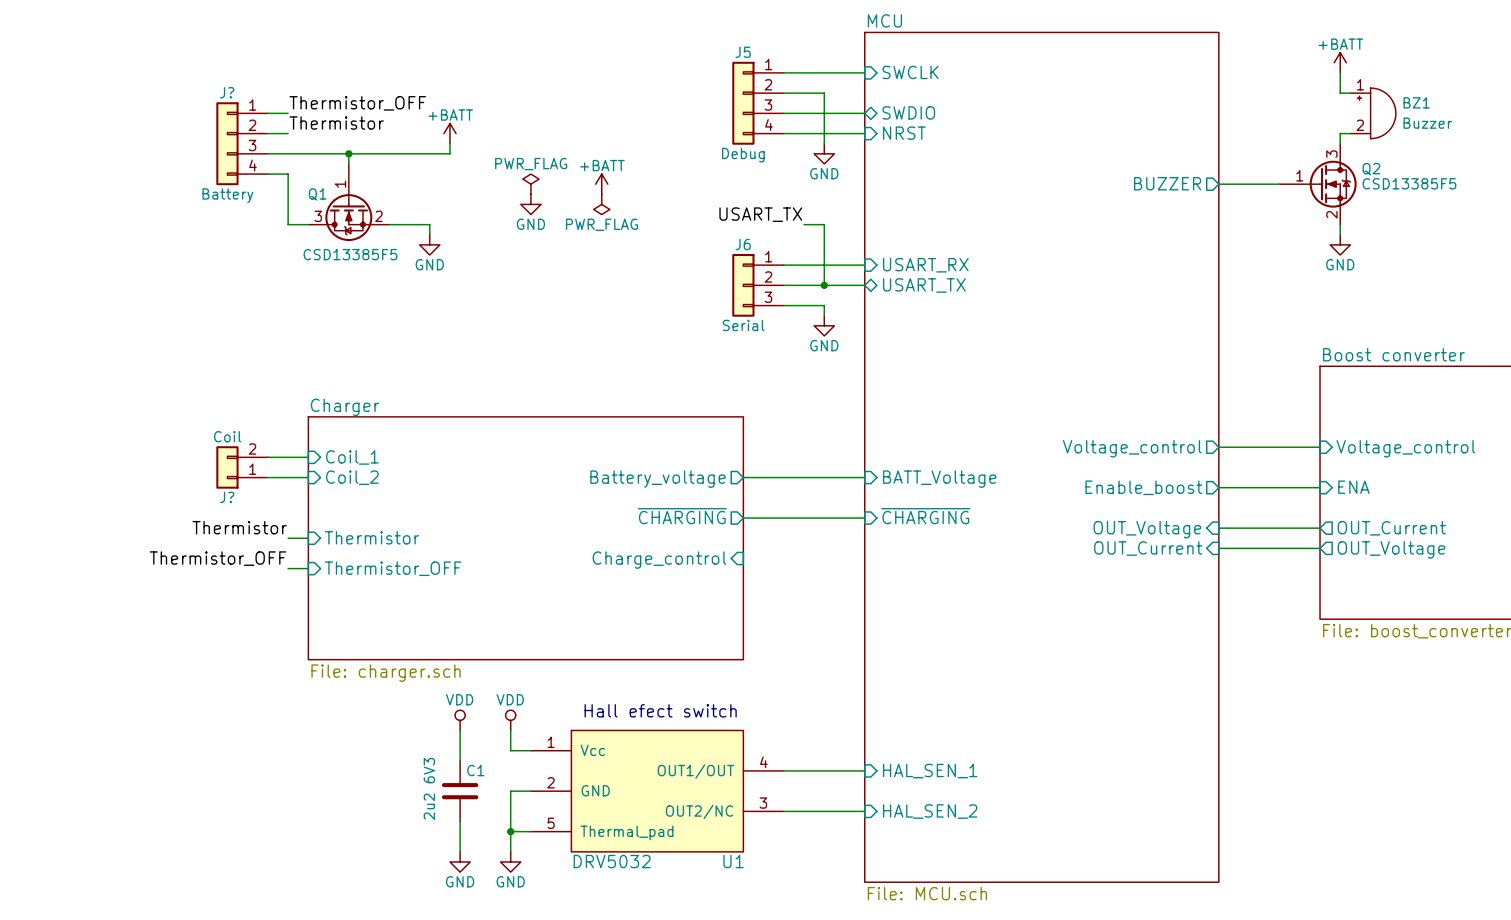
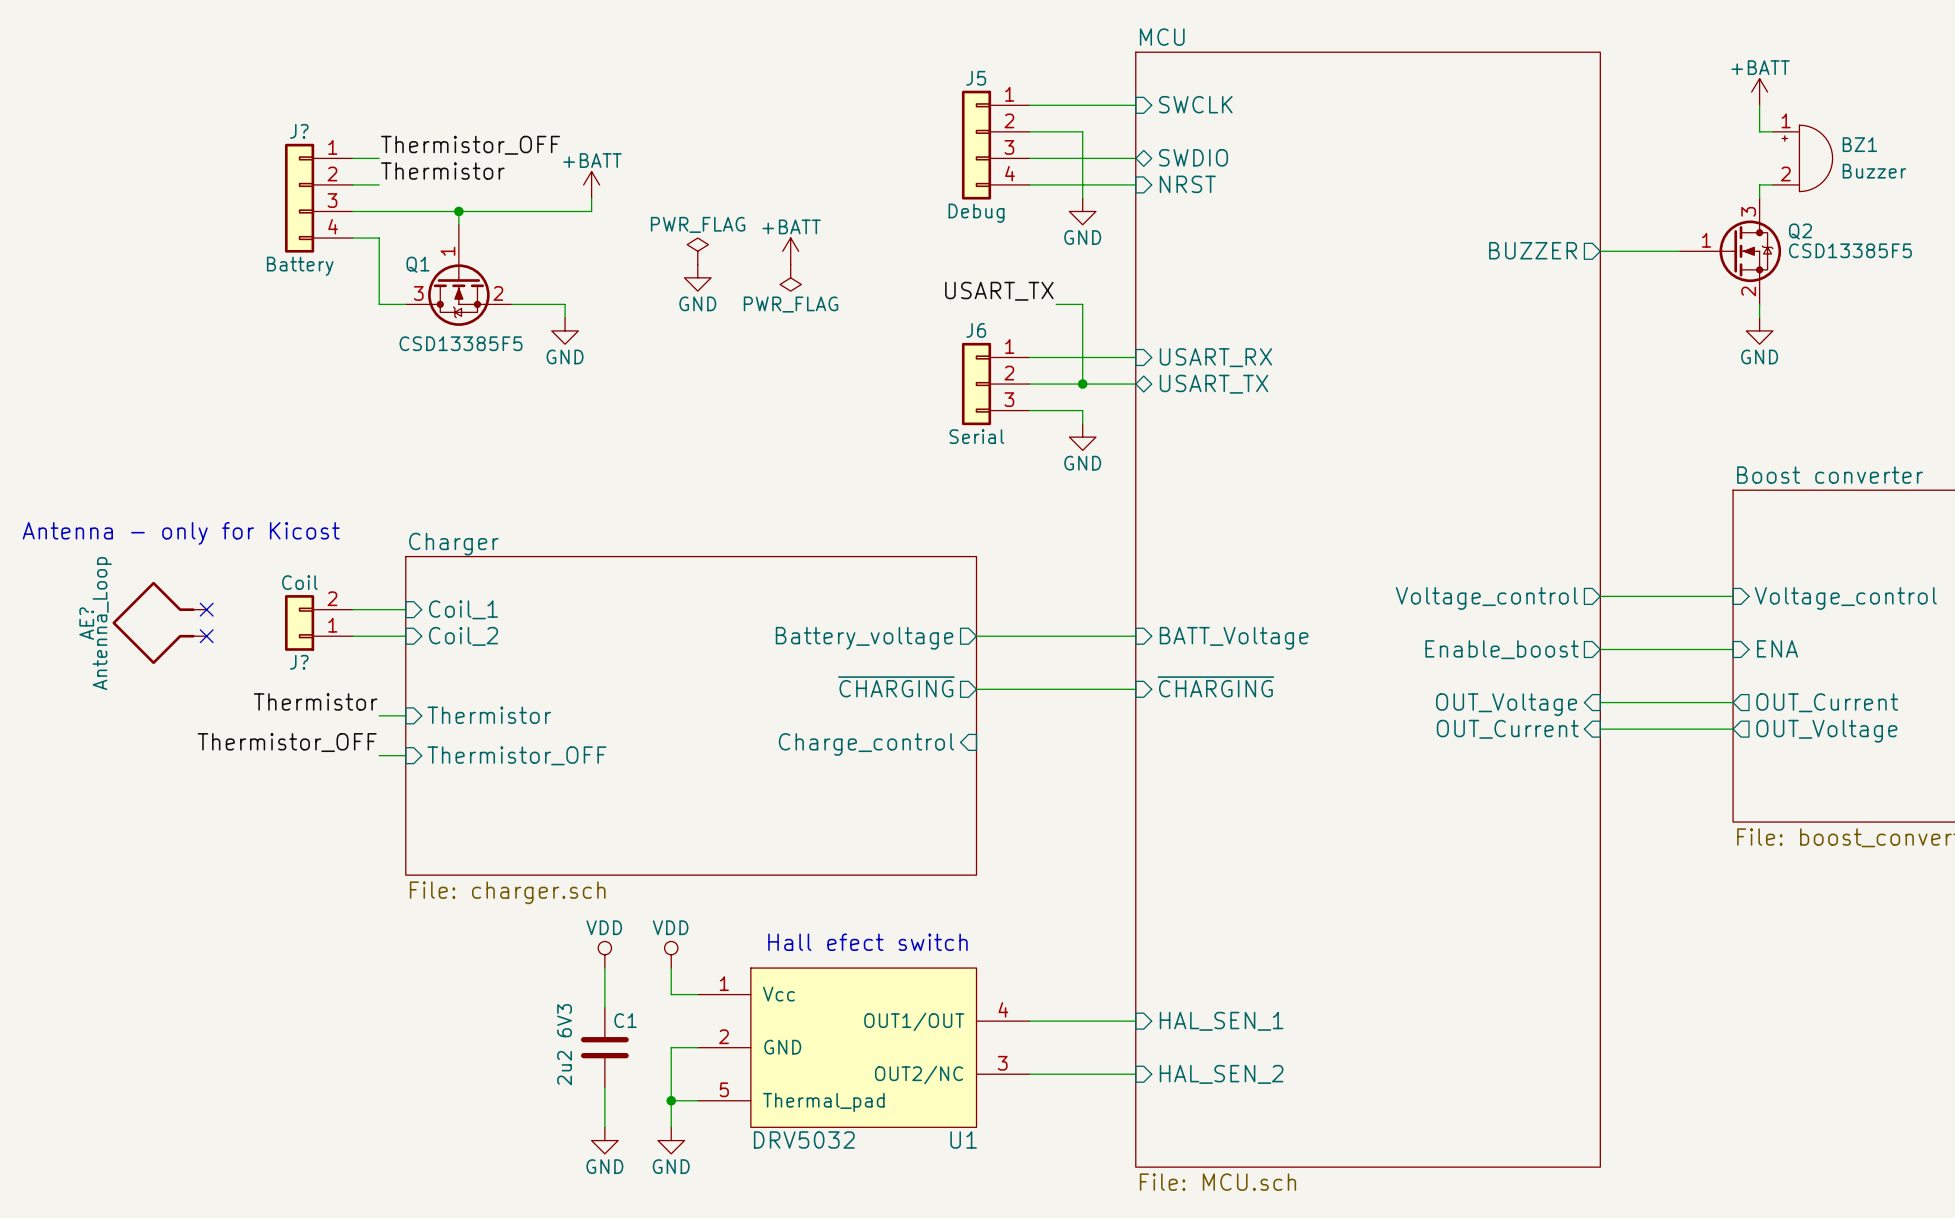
text: none -> Antenna - only for Kicost (181, 533)
no-connect mark: none -> (206, 609)
AE?: none -> Antenna_Loop (159, 622)
no-connect mark: none -> (206, 636)

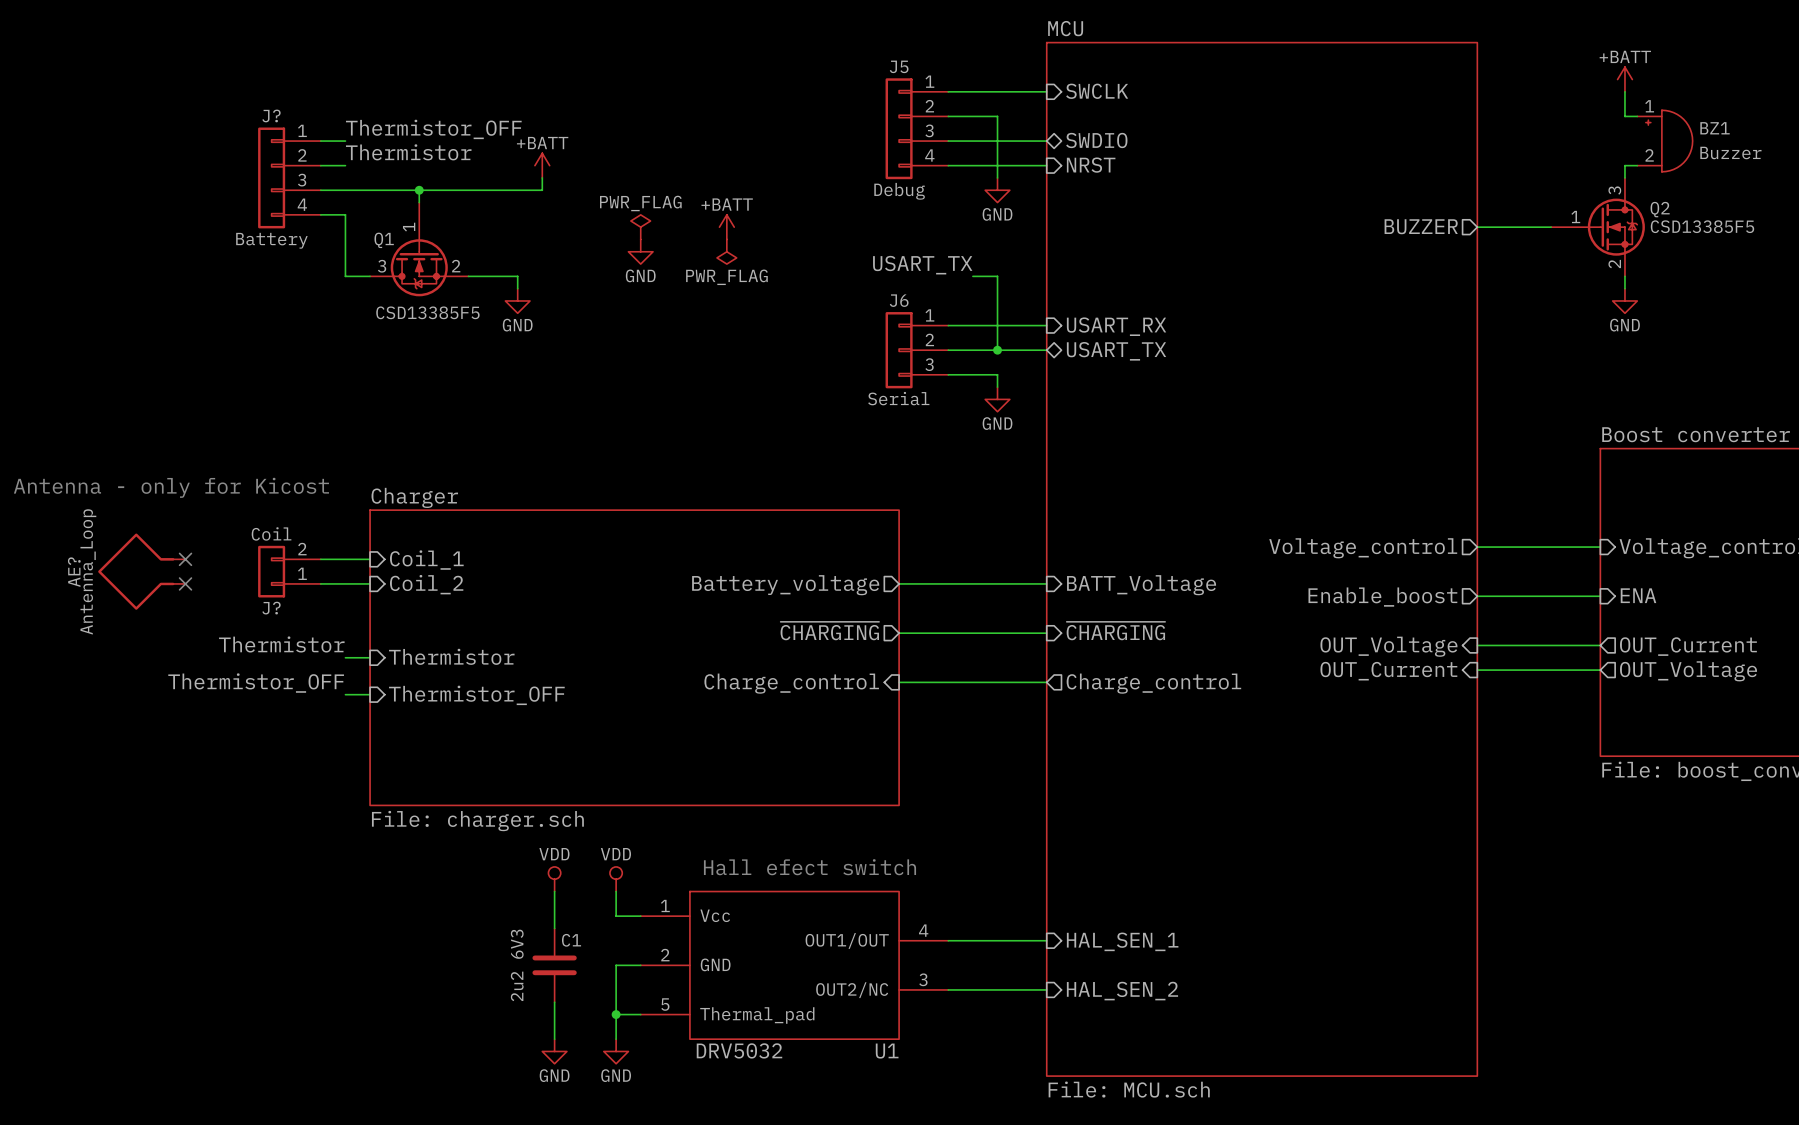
wire: none -> (899, 682) (1046, 682)
sheet pin: none -> Charge_control (1153, 683)

